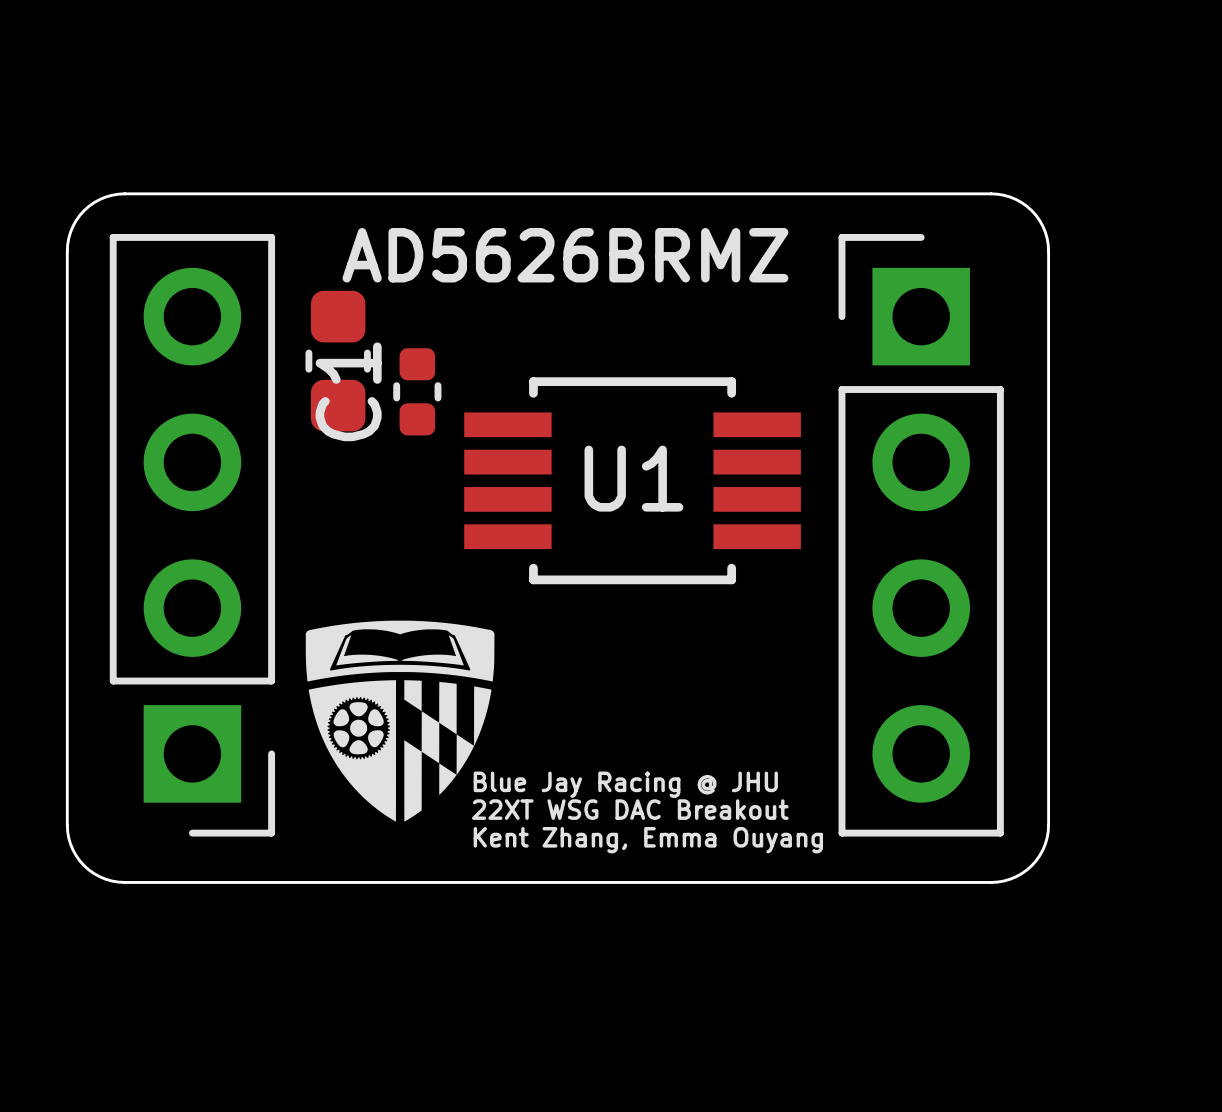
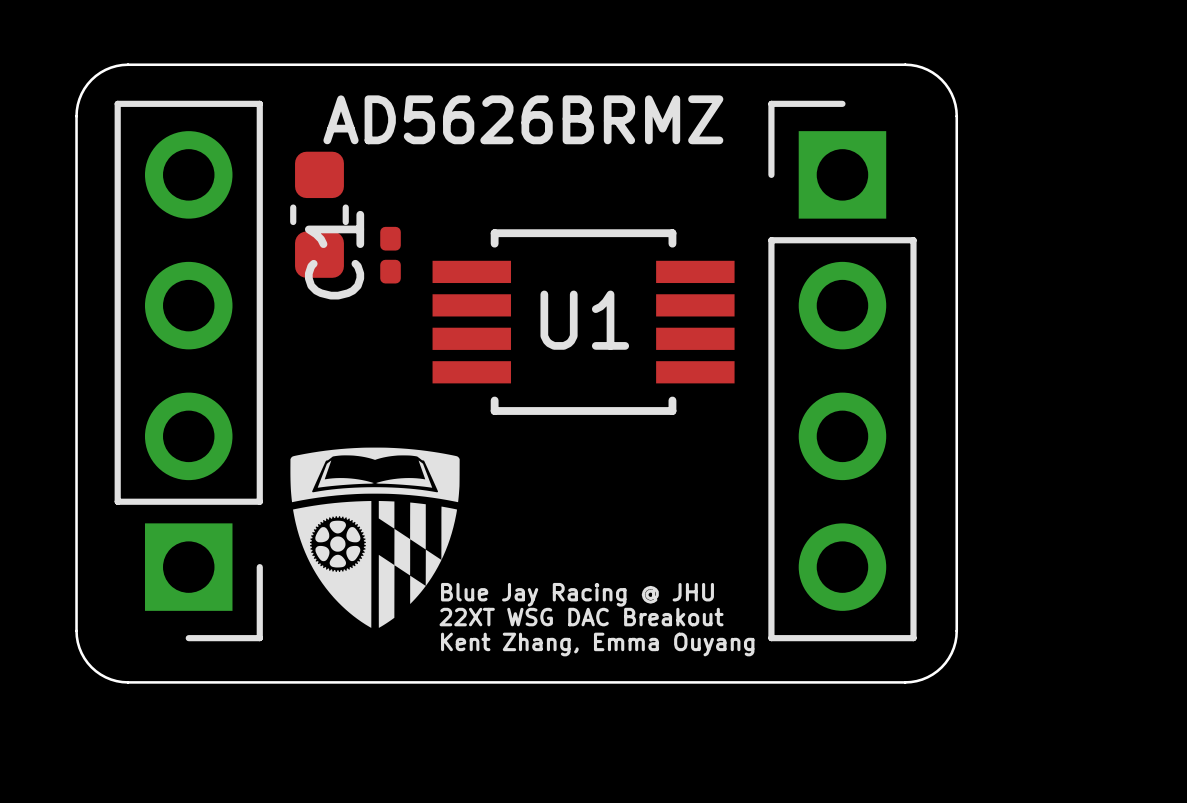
C1 footprint: [393, 348, 442, 436] -> [380, 226, 401, 284]

